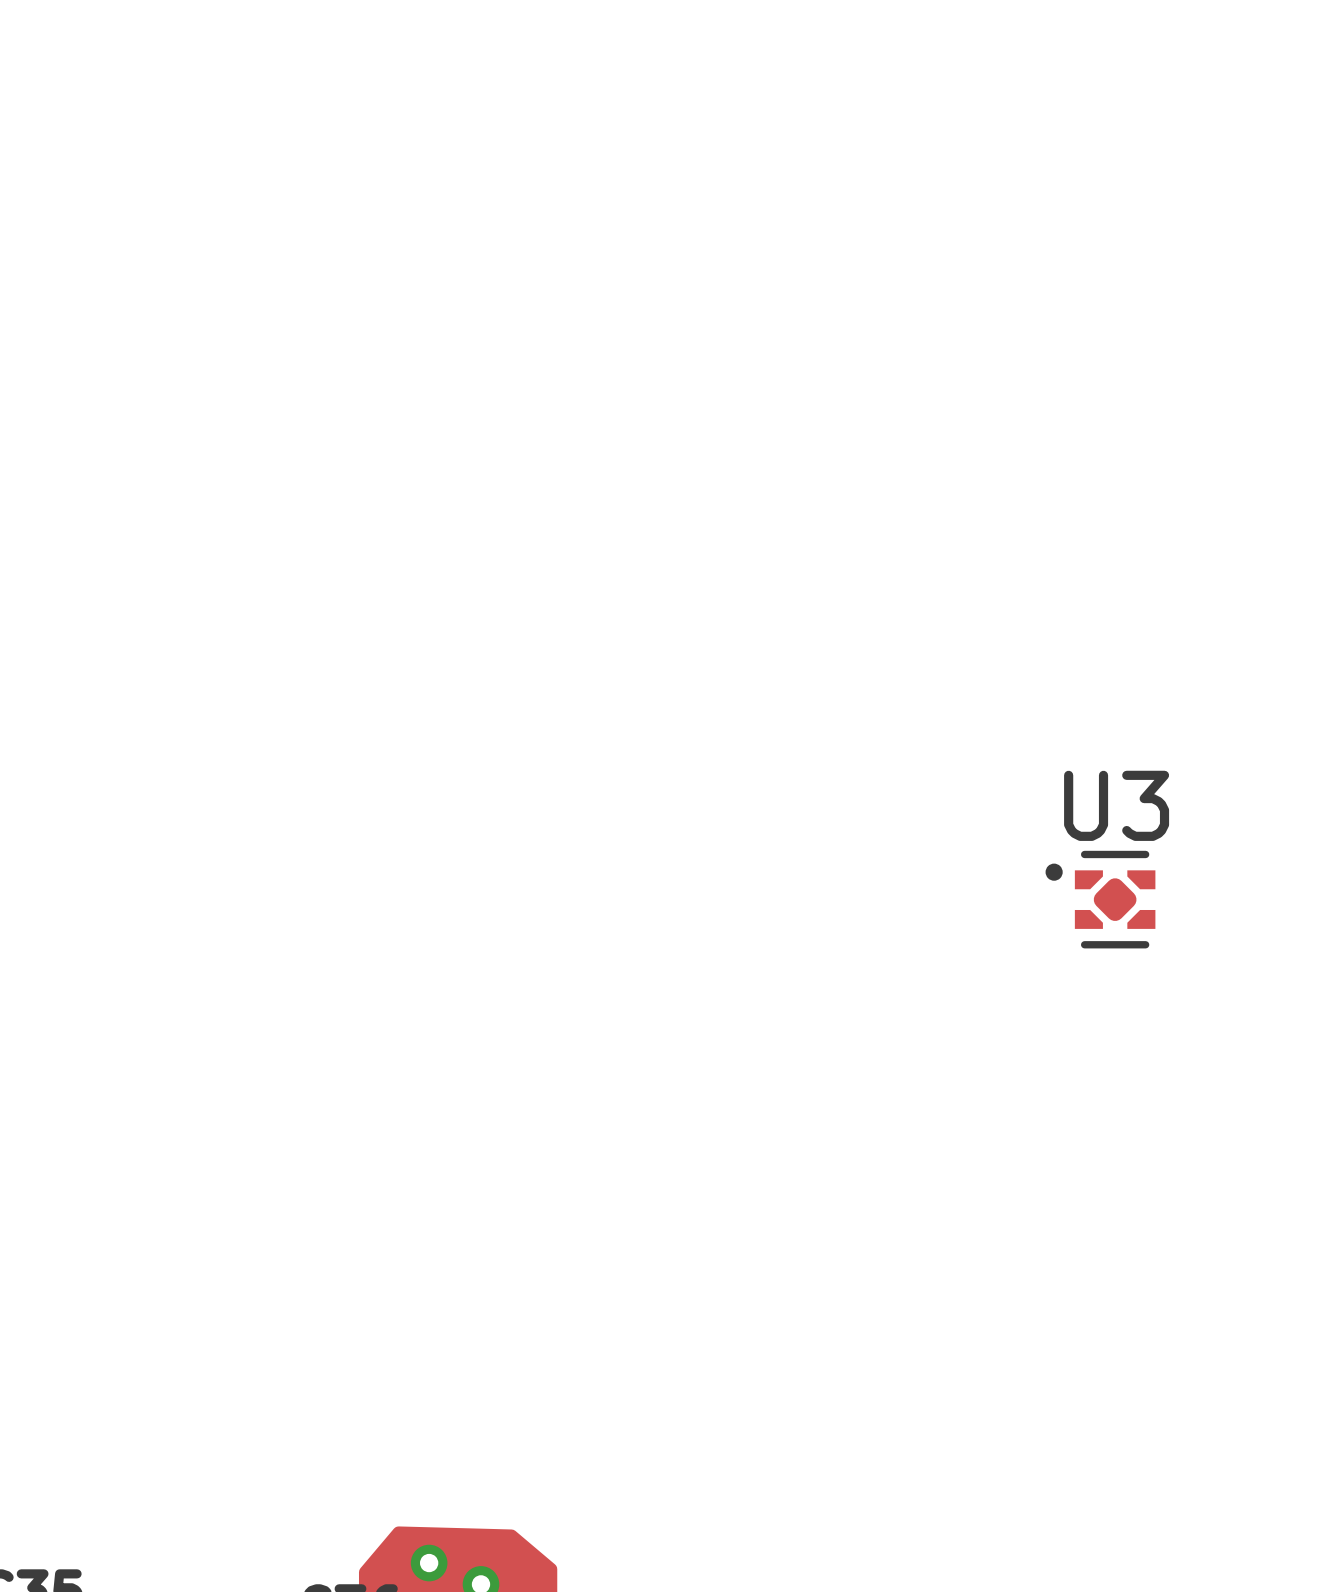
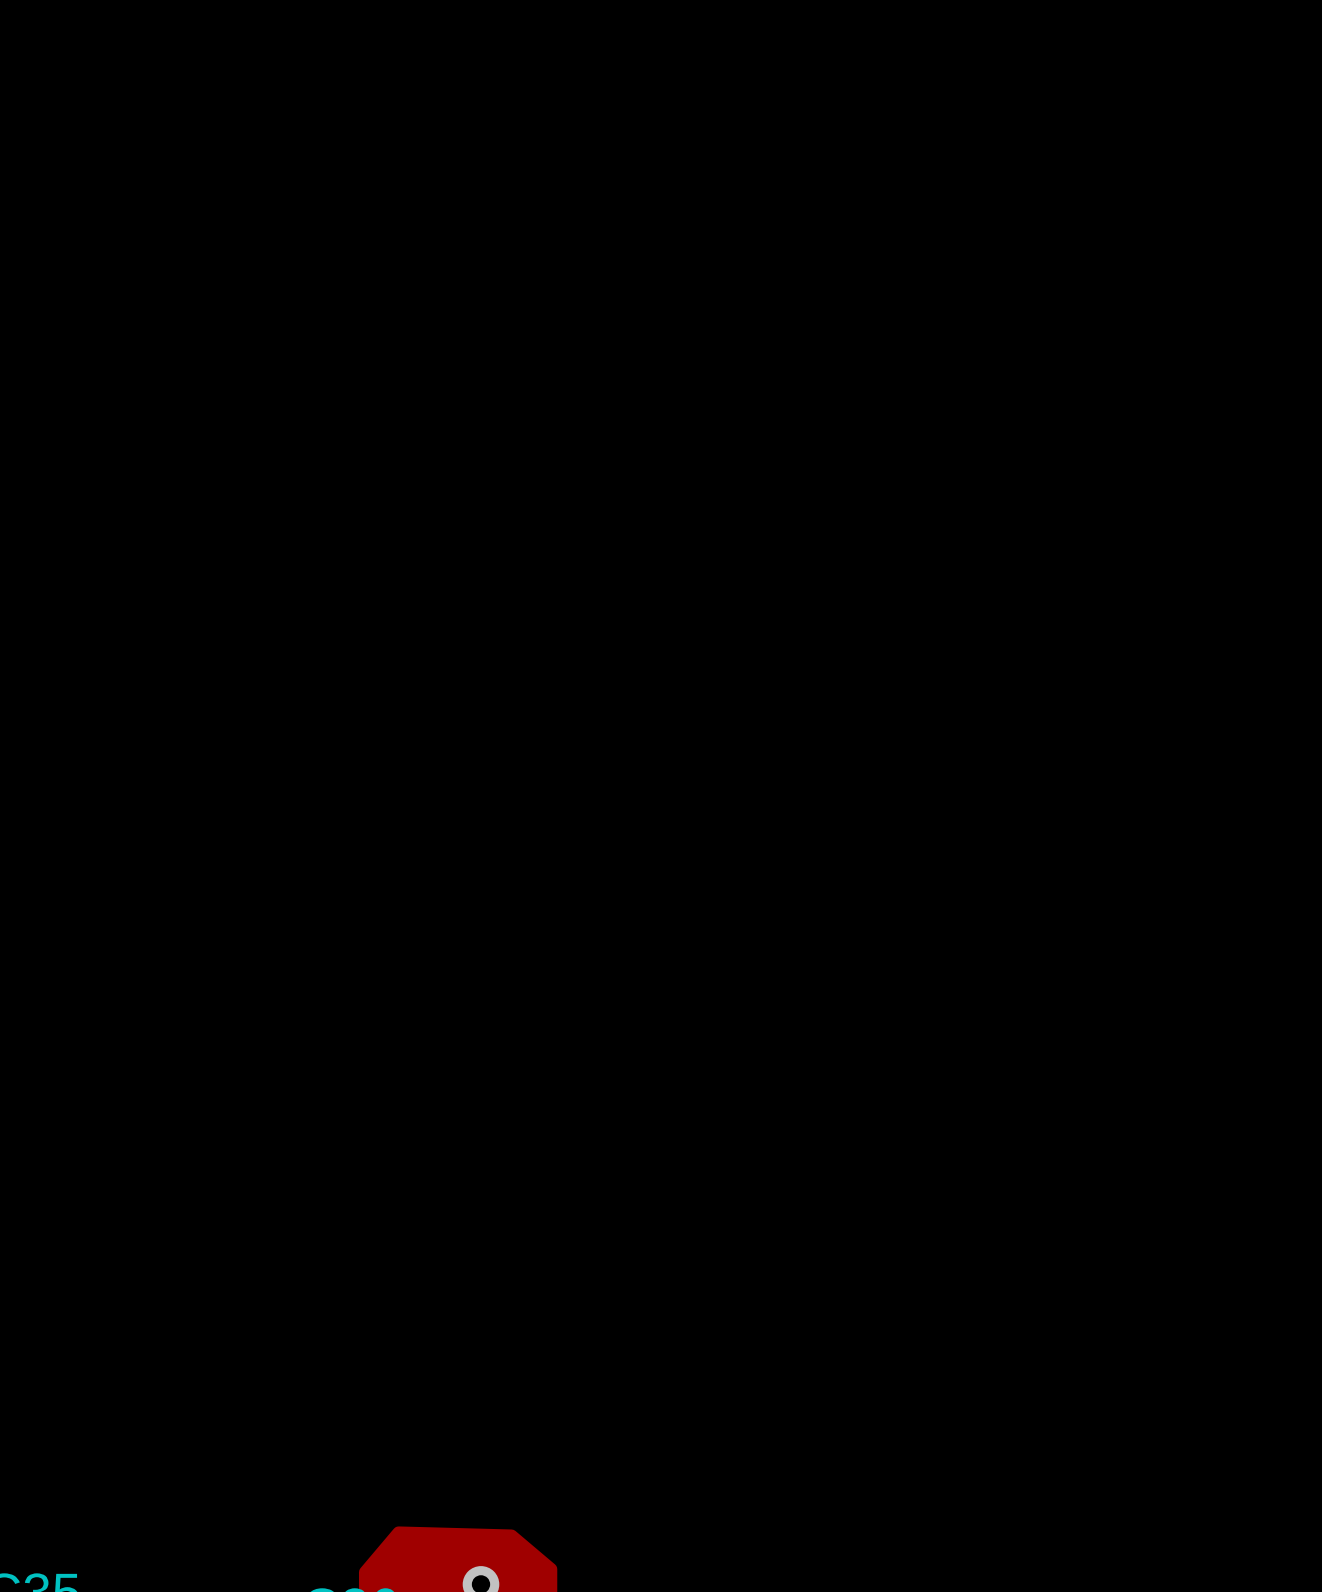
U3: (1100, 899) -> none
via: (429, 1563) -> none

